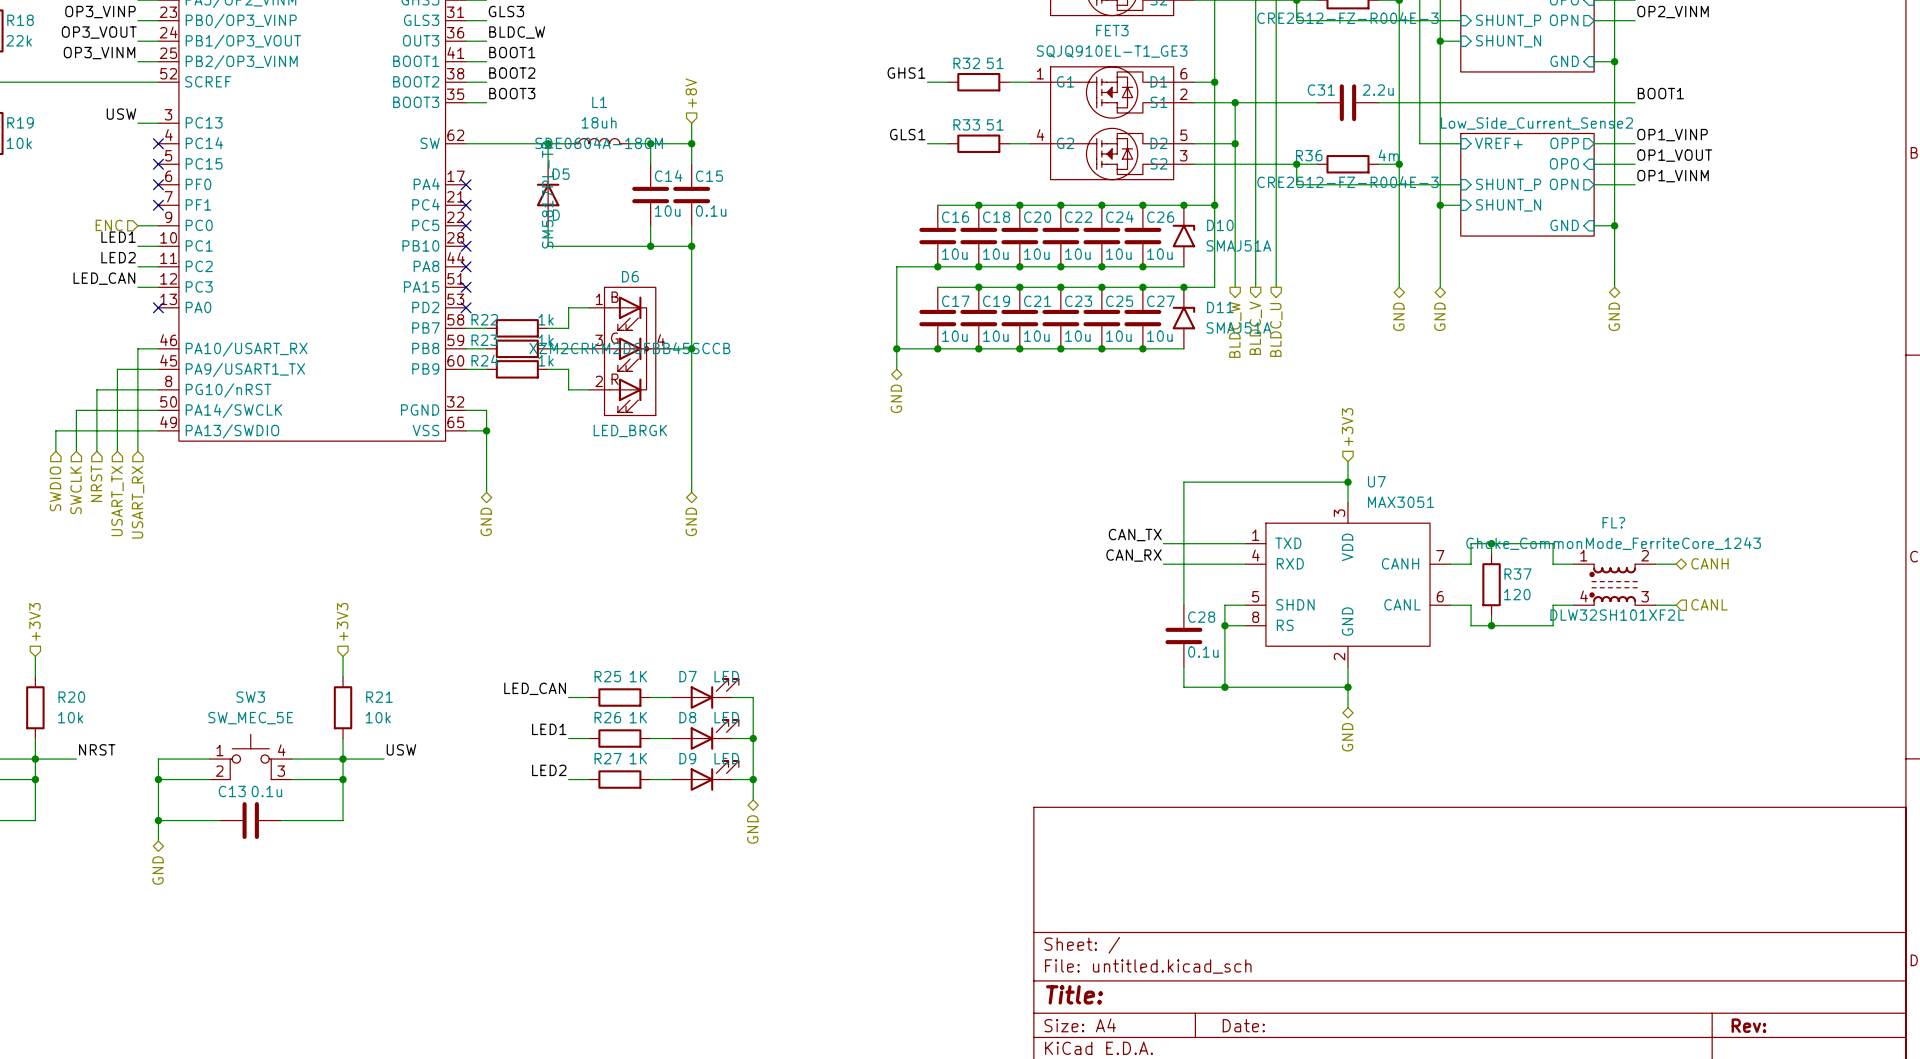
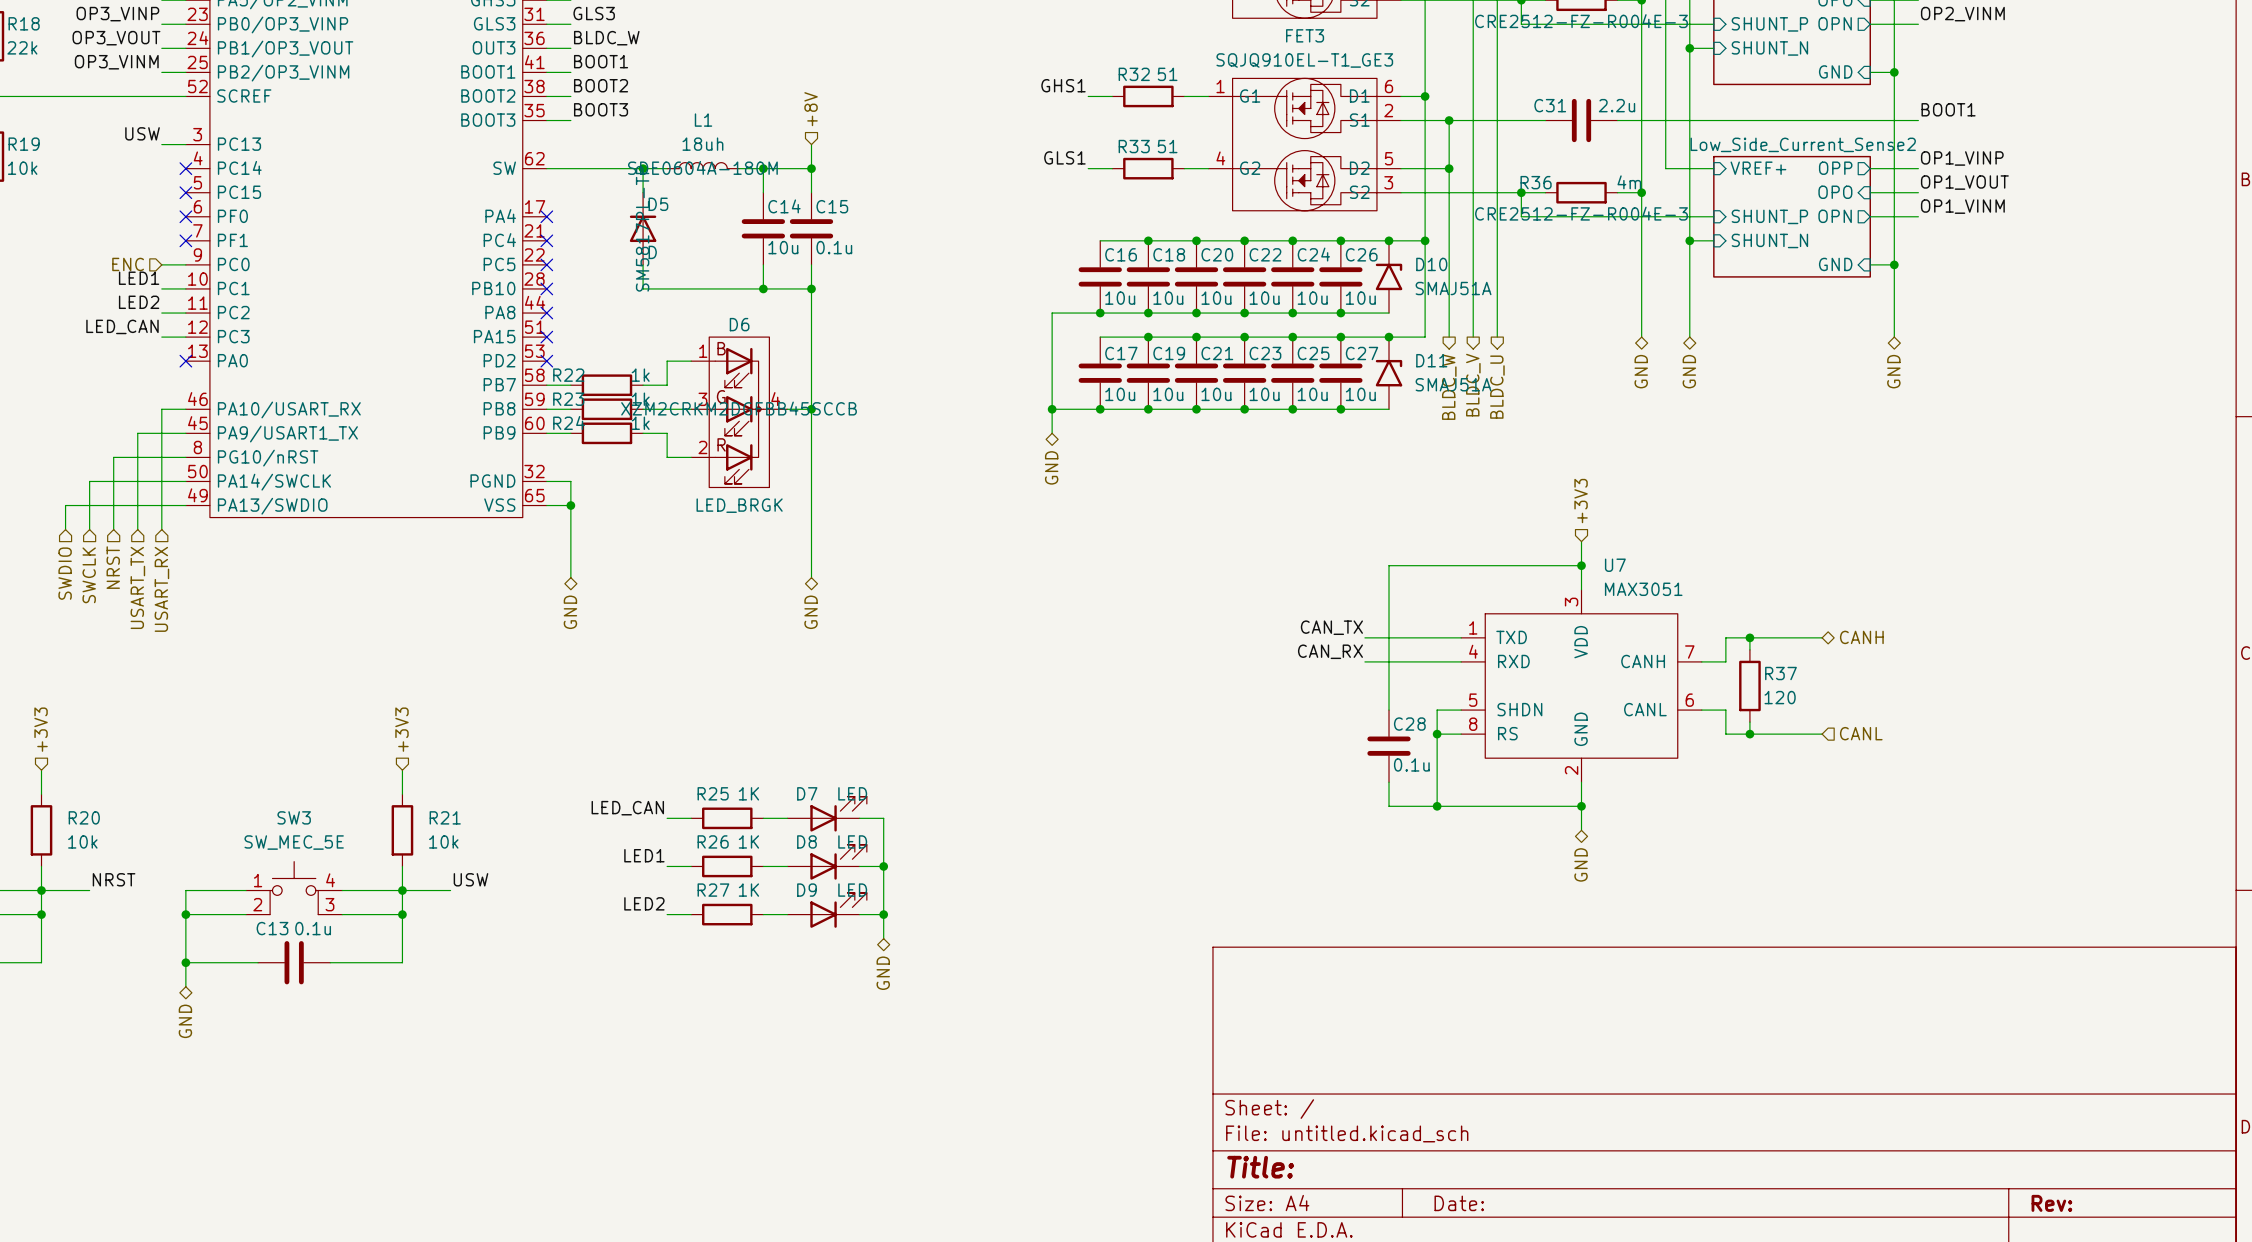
wire: (1553, 543) (1553, 564) (1573, 564) -> none
hierarchical label position: CANH (1709, 563) -> CANH (1861, 637)
wire: (1655, 564) (1676, 564) -> none
FL?: Choke_CommonMode_FerriteCore_1243 (1614, 584) -> none
hierarchical label position: CANL (1709, 604) -> CANL (1861, 733)
wire: (1573, 605) (1553, 605) (1553, 625) -> none
wire: (1655, 605) (1676, 605) -> none

